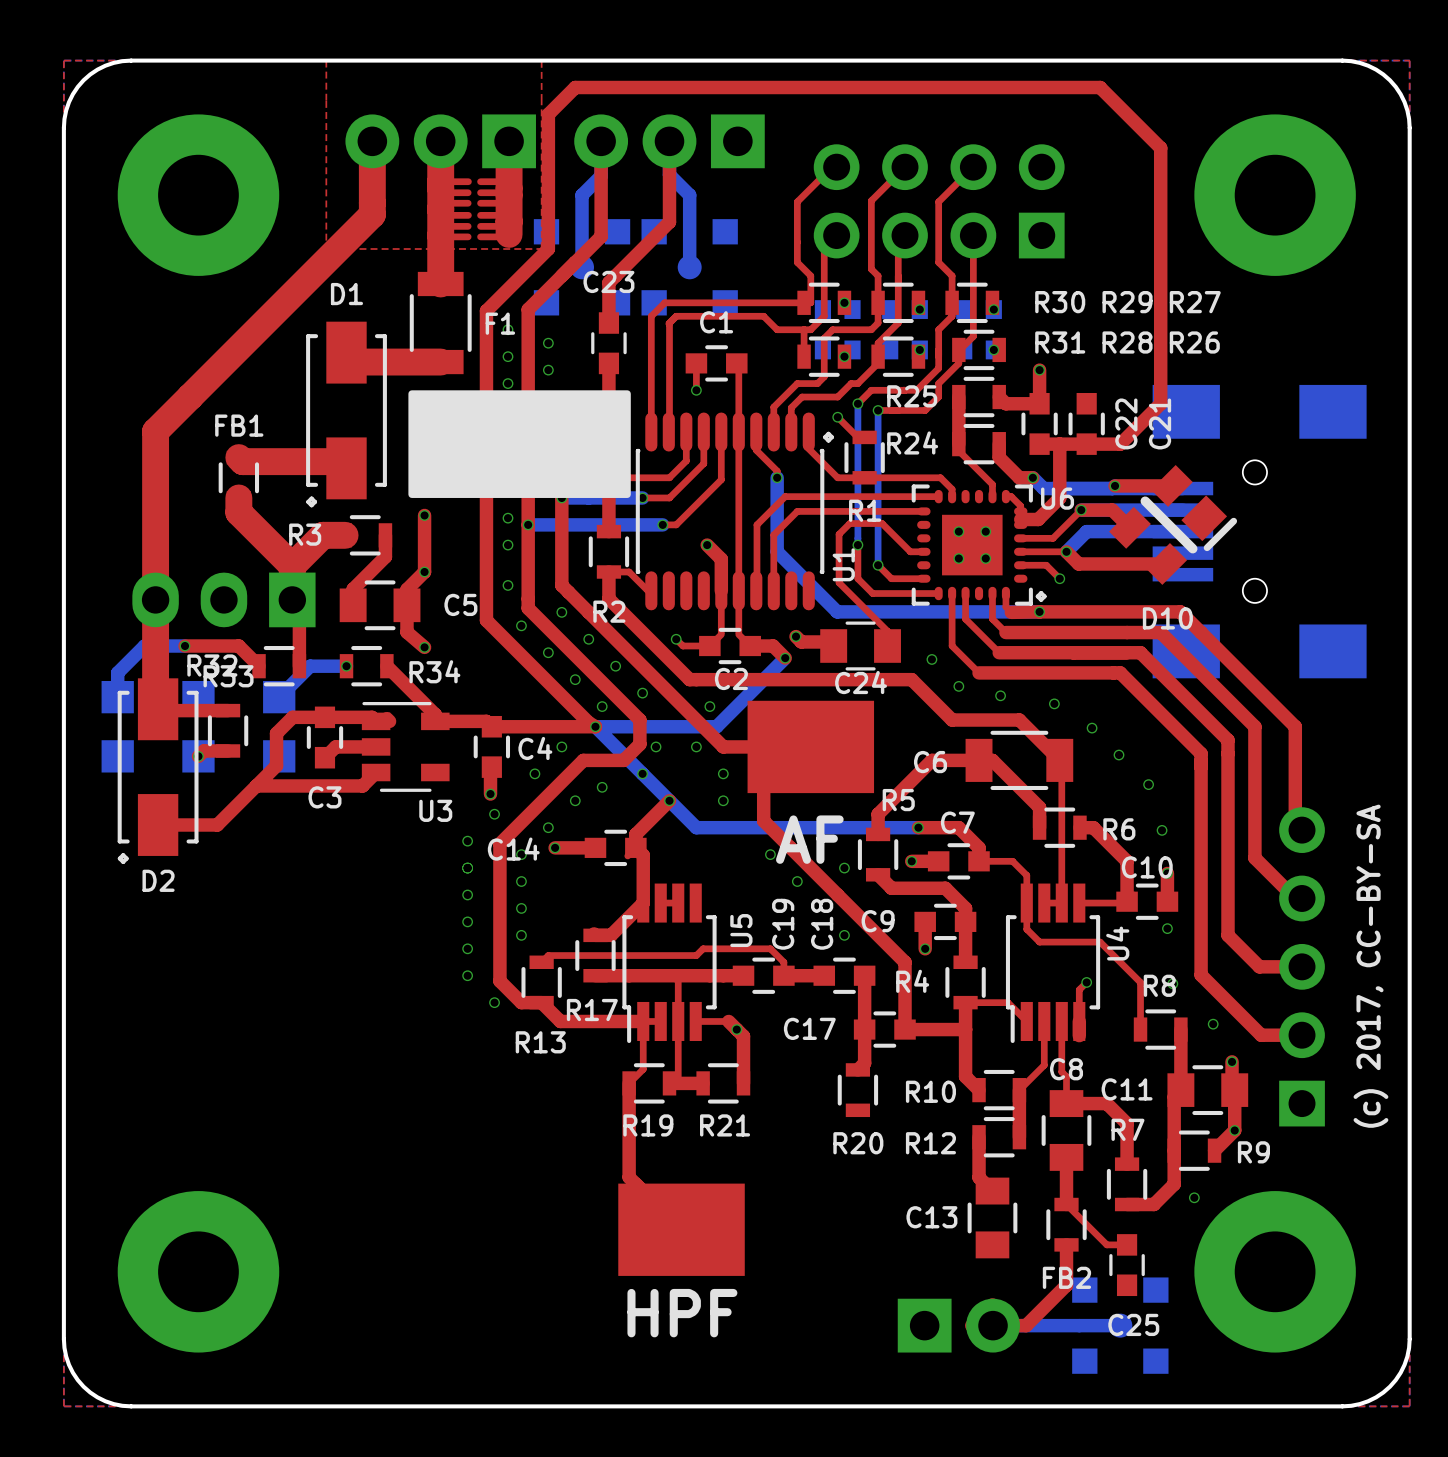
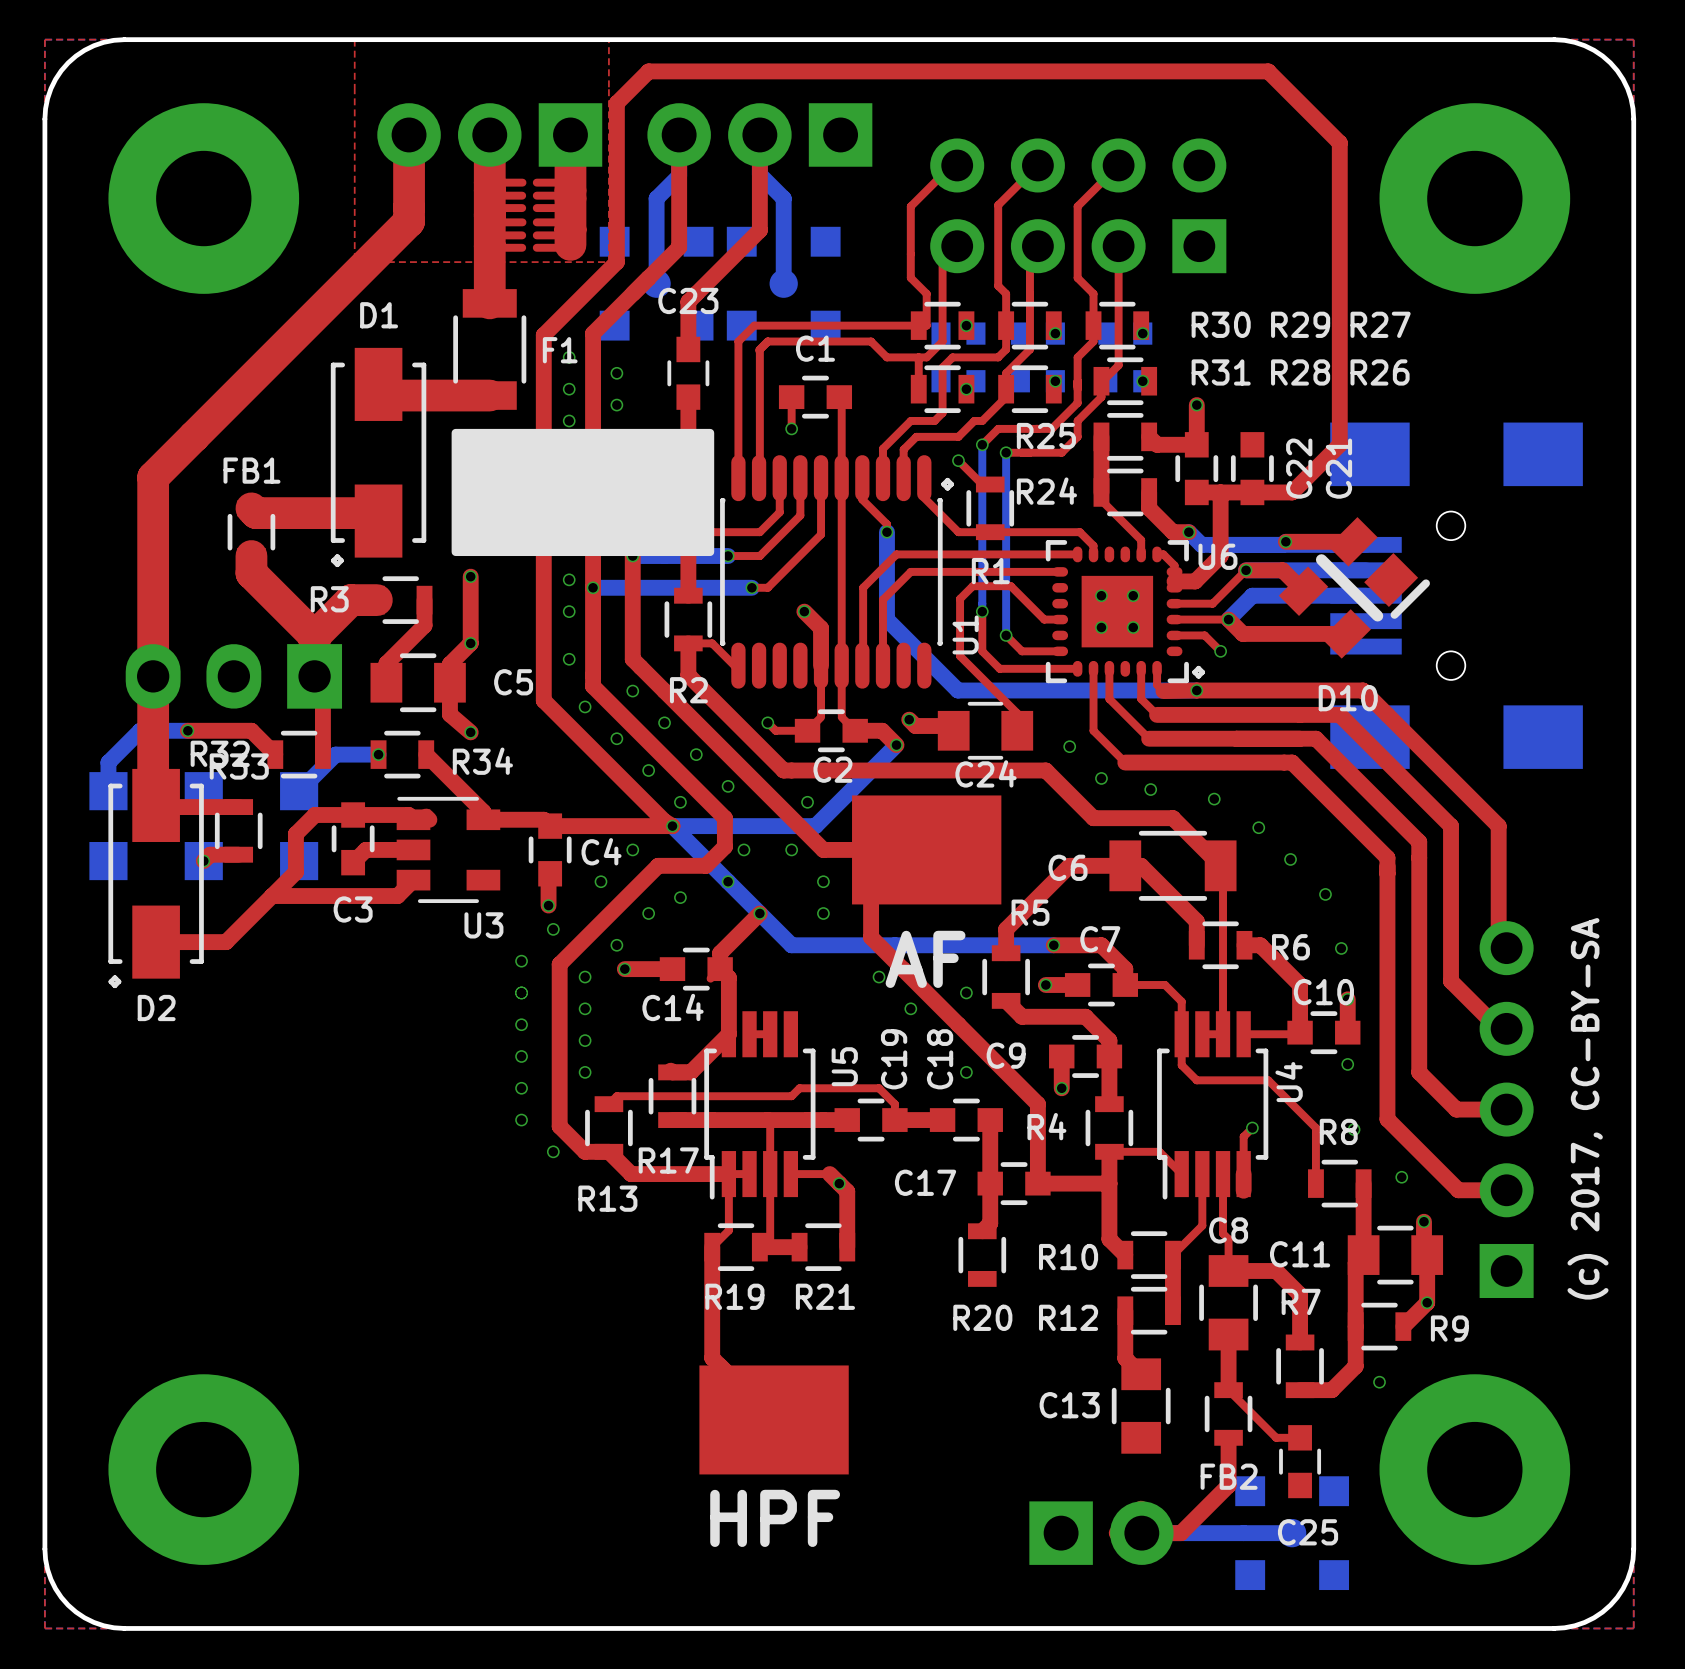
C14 name position: C14 (513, 849) -> C14 (673, 1007)

